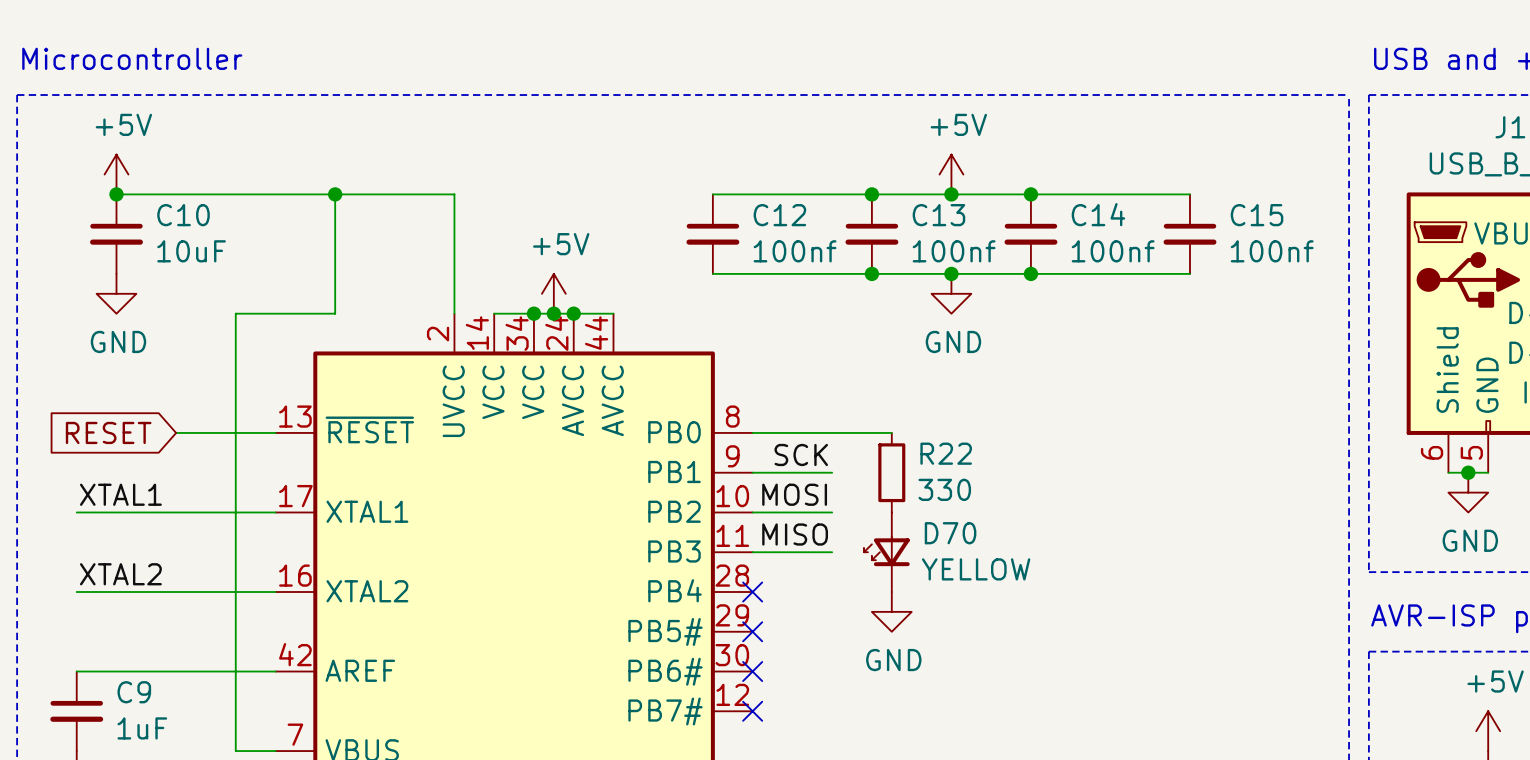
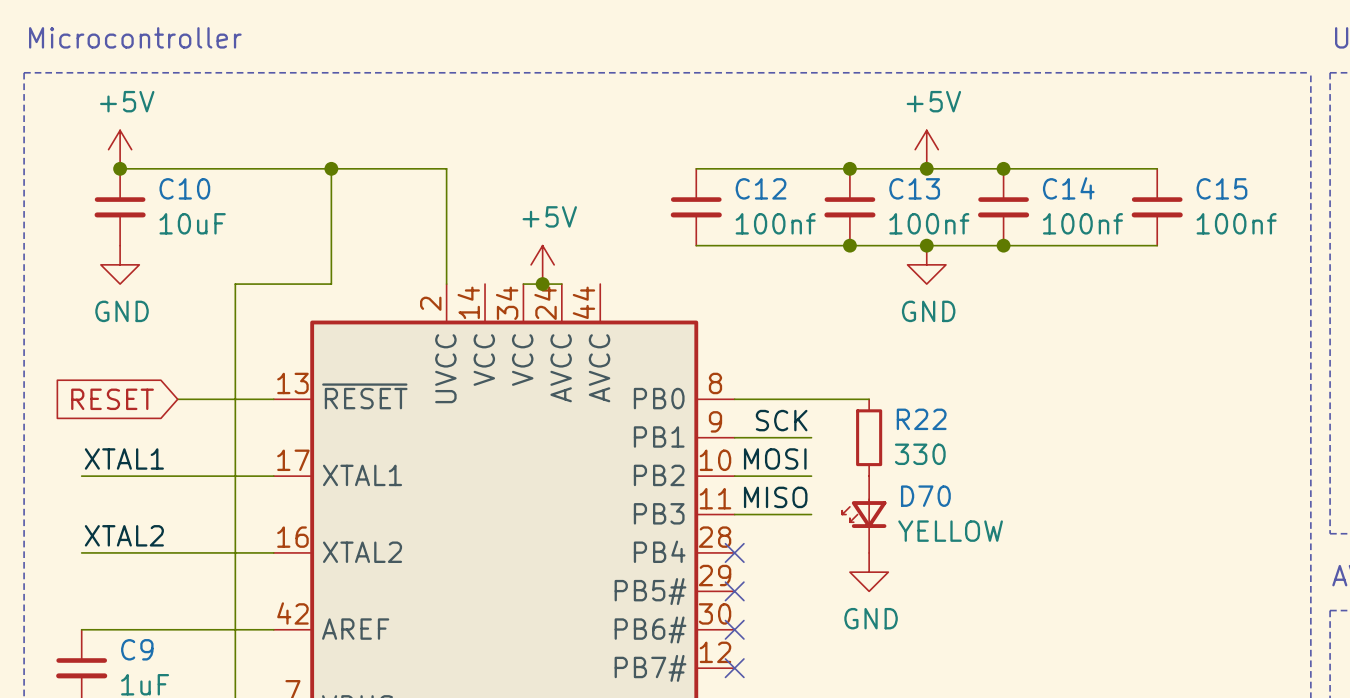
wire: (494, 313) (533, 313) -> none
junction: (533, 313) -> none
wire: (573, 313) (613, 313) -> none
junction: (573, 313) -> none

